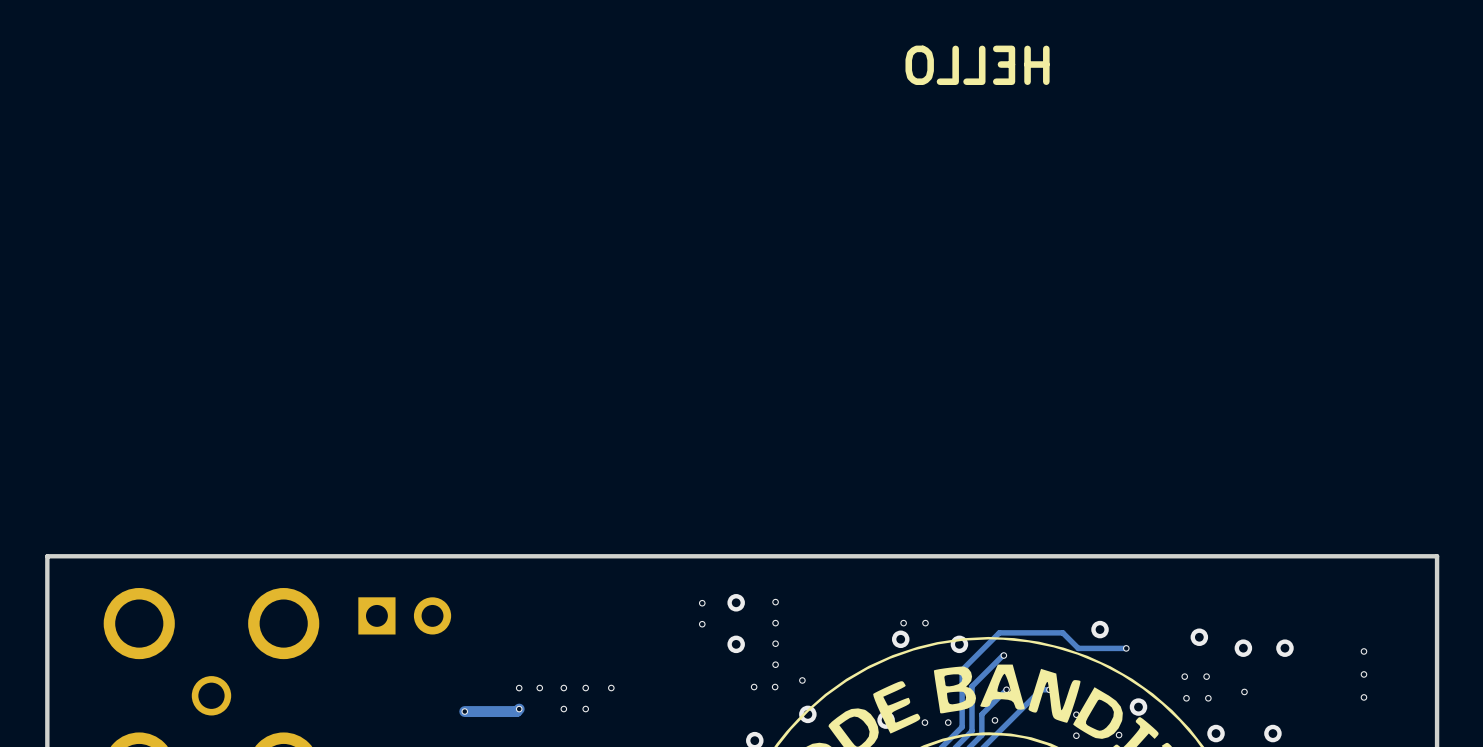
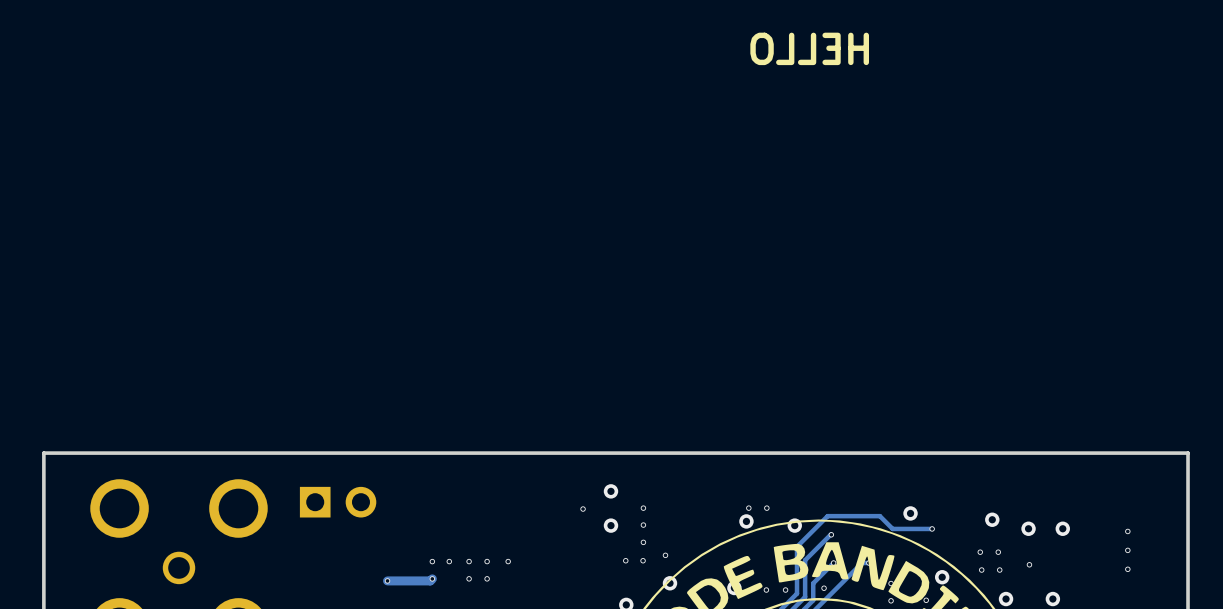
via: (775, 602) -> none
via: (702, 603) -> none

